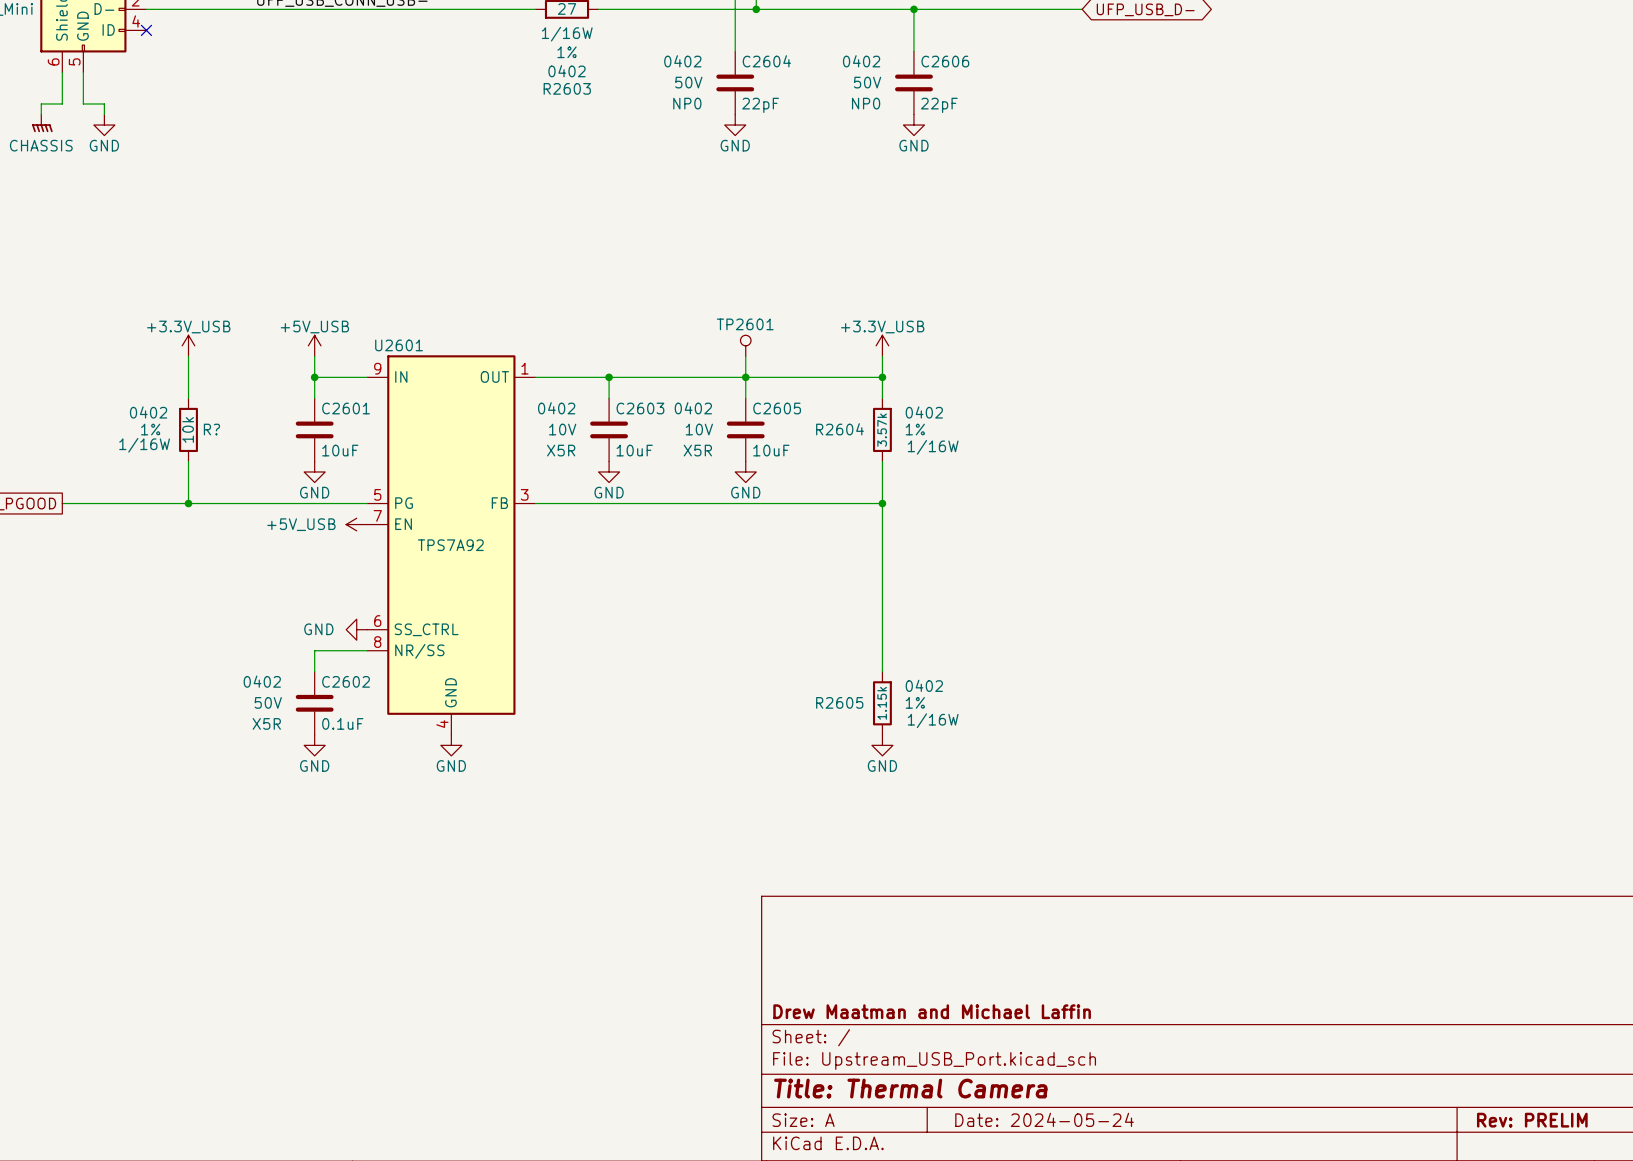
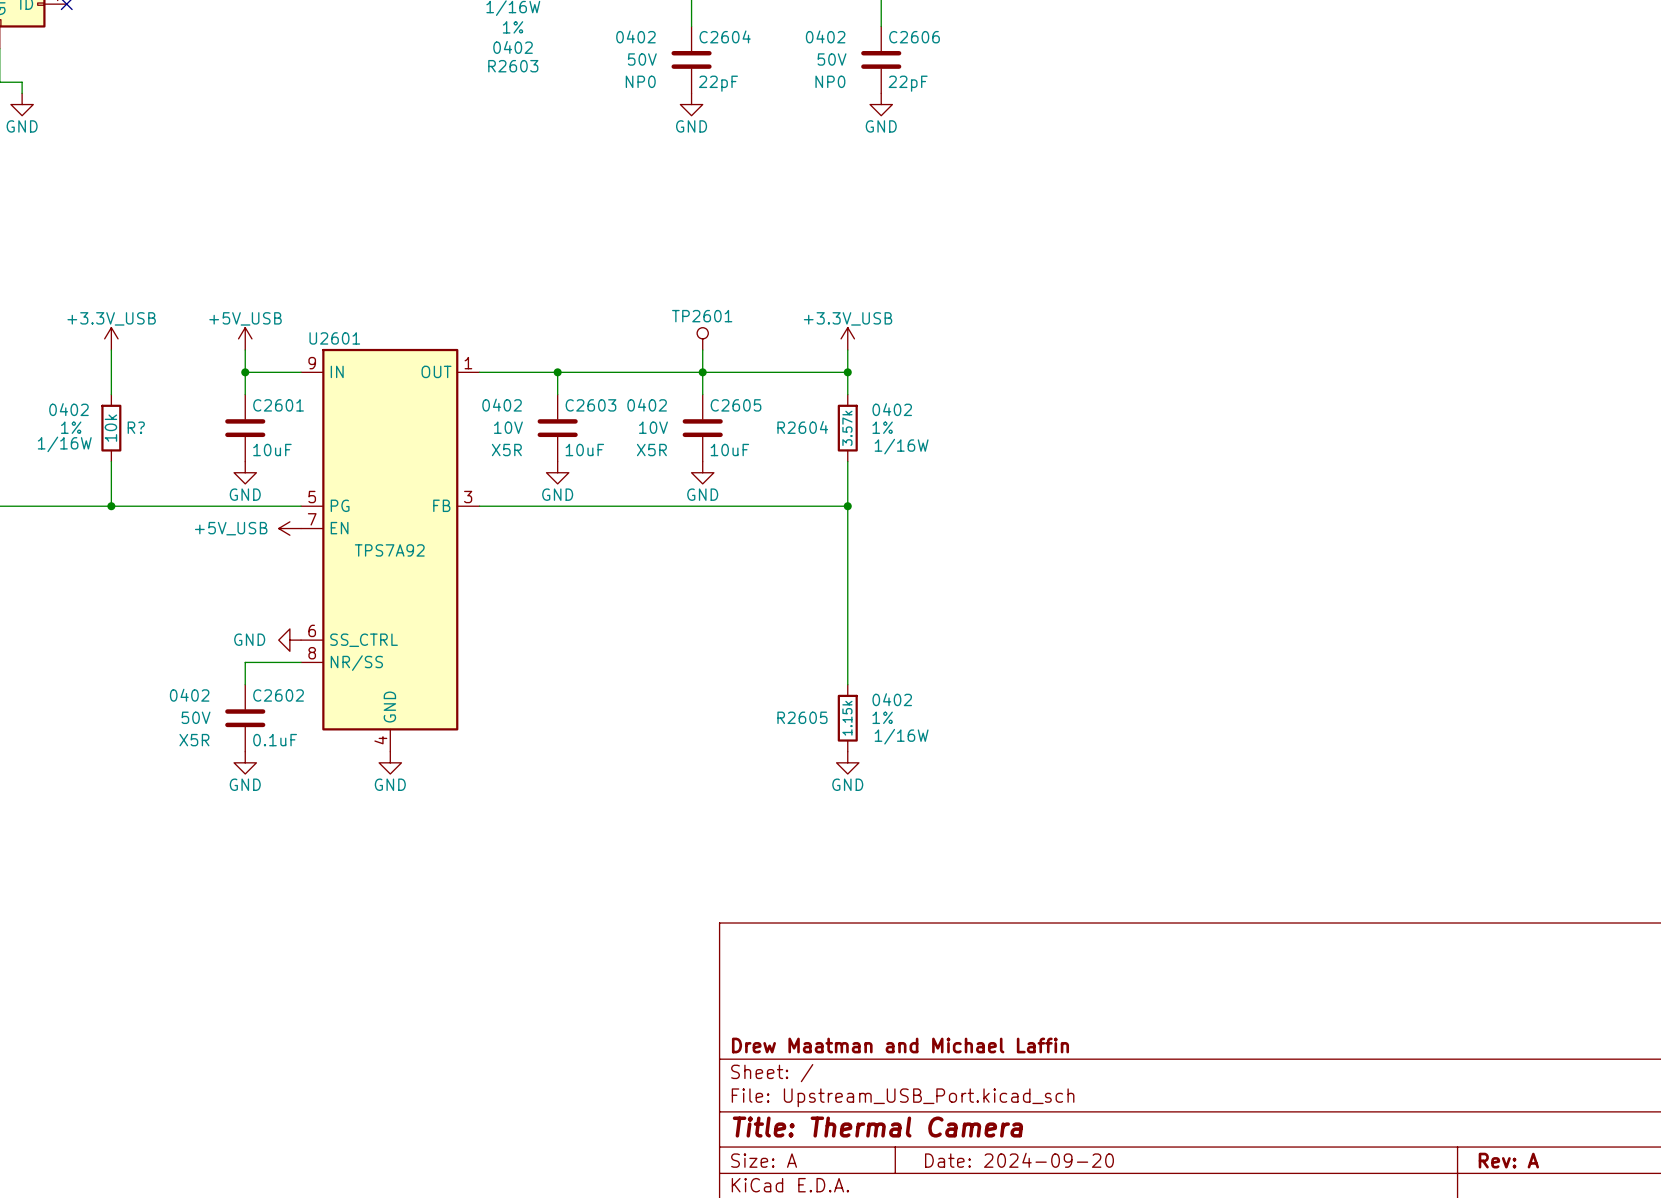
title block: Date: 2024-05-24 (1044, 1119) -> Date: 2024-09-20 (1019, 1160)
title block: Rev: PRELIM (1532, 1120) -> Rev: A (1508, 1160)

